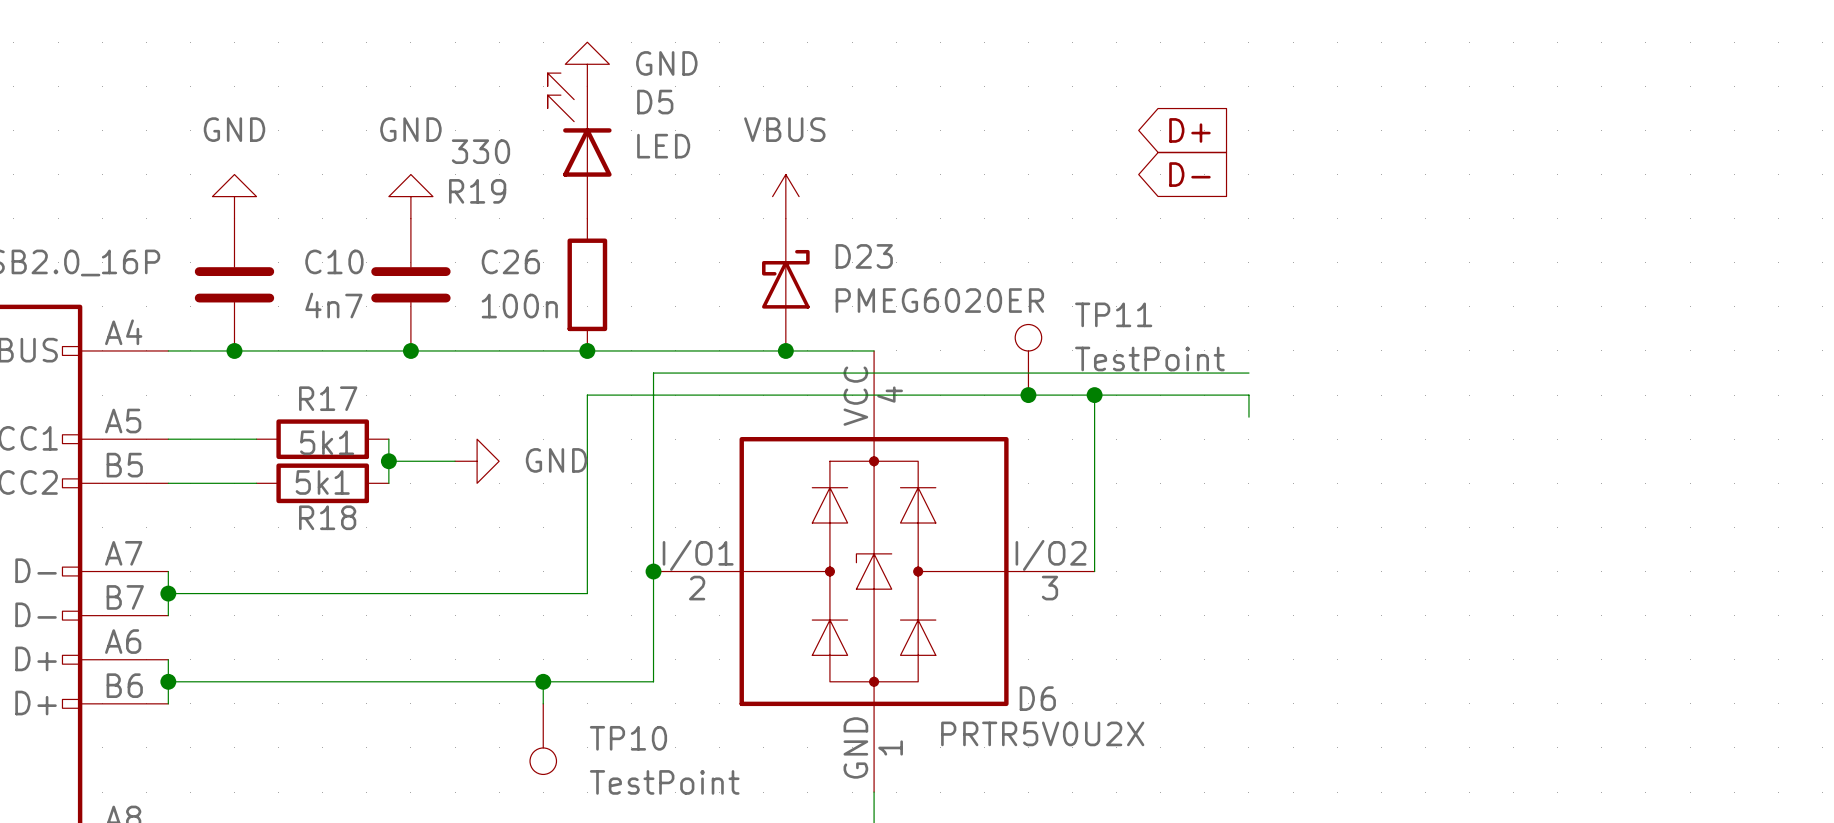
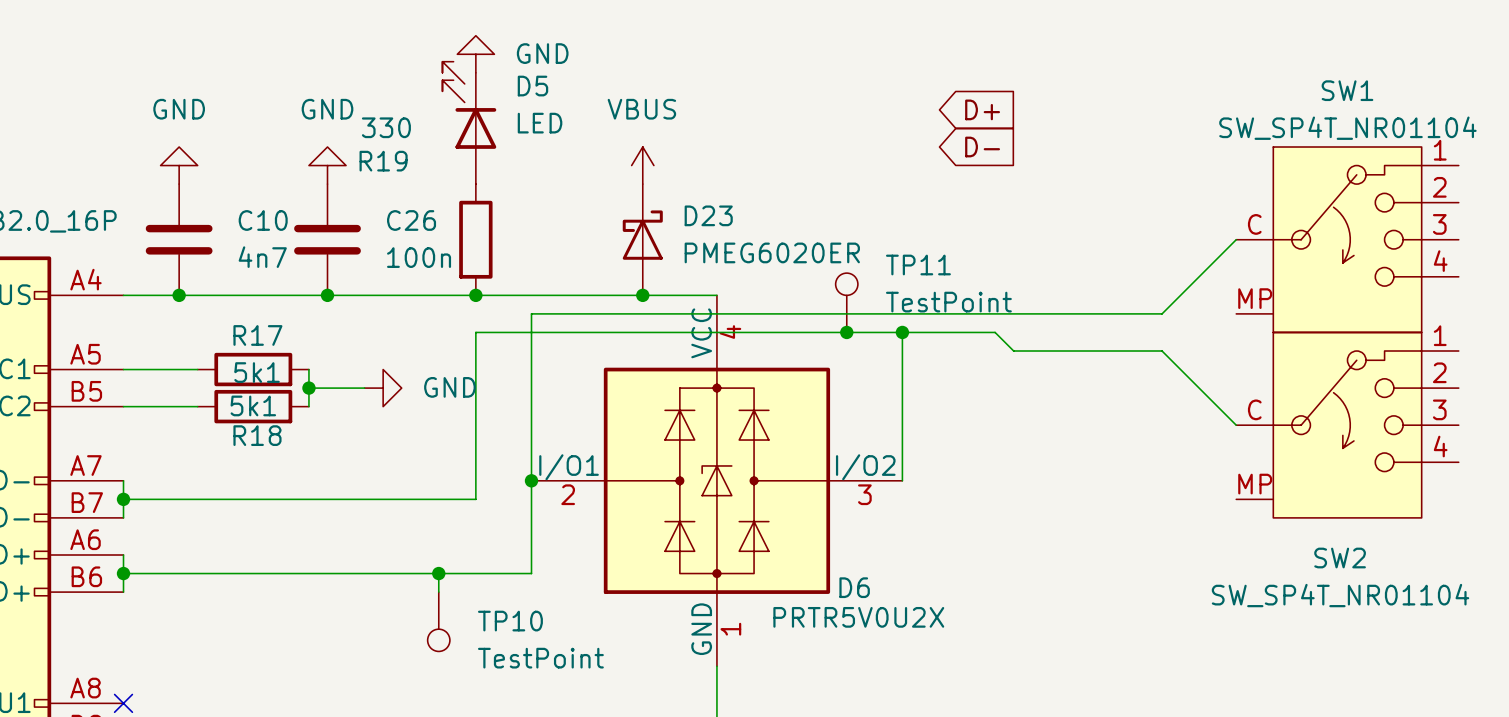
wire: none -> (1236, 239) (1162, 313) (1032, 313)
SW1: none -> SW_SP4T_NR01104 (1347, 239)
wire: (1204, 395) (1248, 395) (1248, 417) -> (995, 332) (1013, 351) (1162, 351) (1236, 425)
SW2: none -> SW_SP4T_NR01104 (1347, 425)

